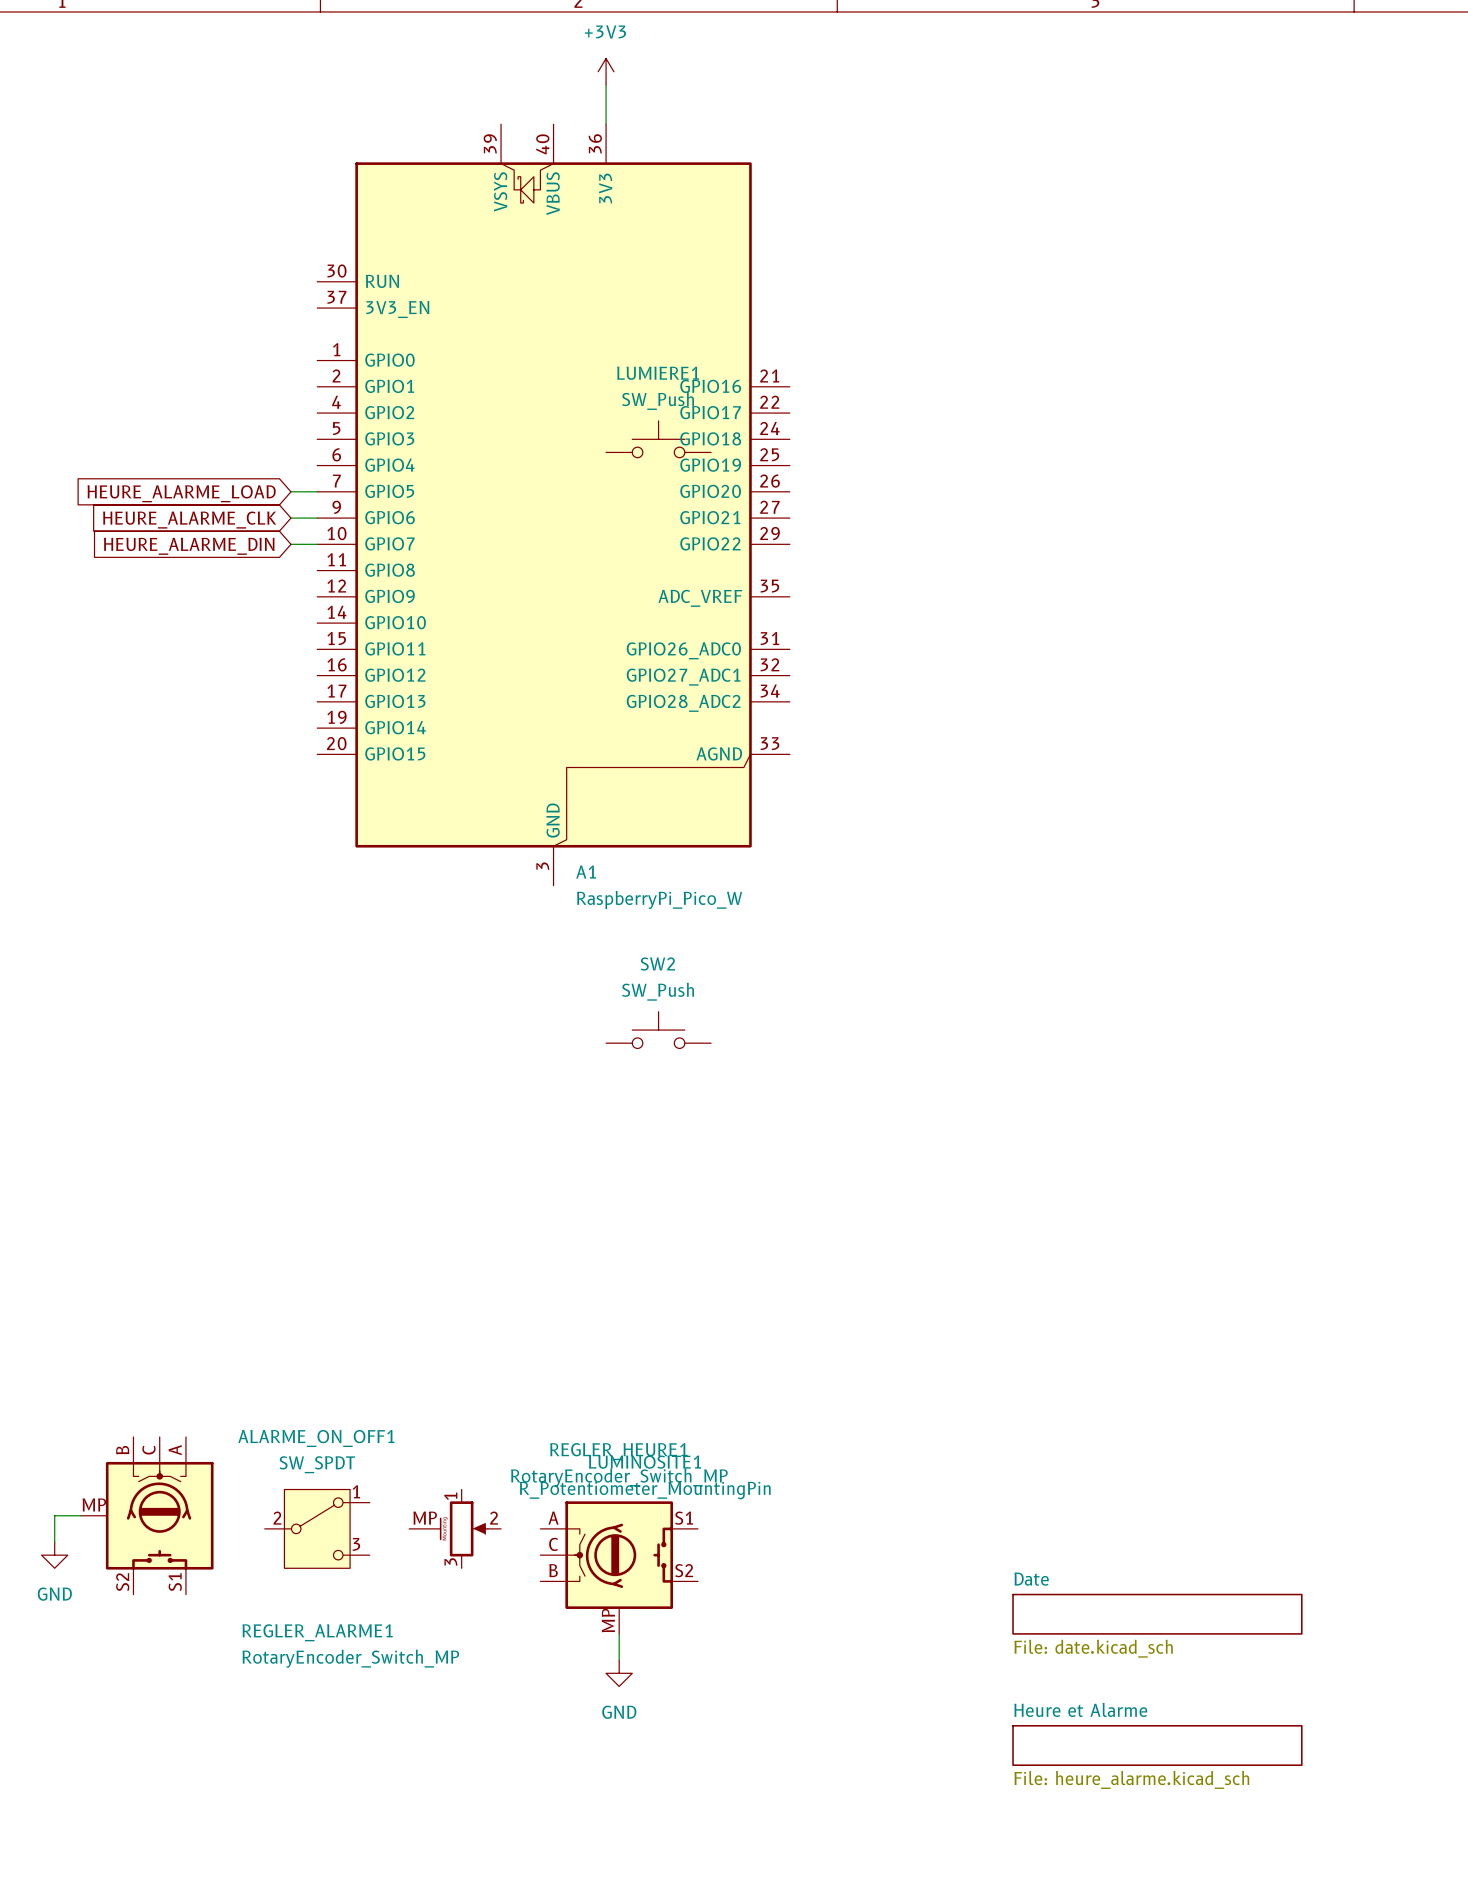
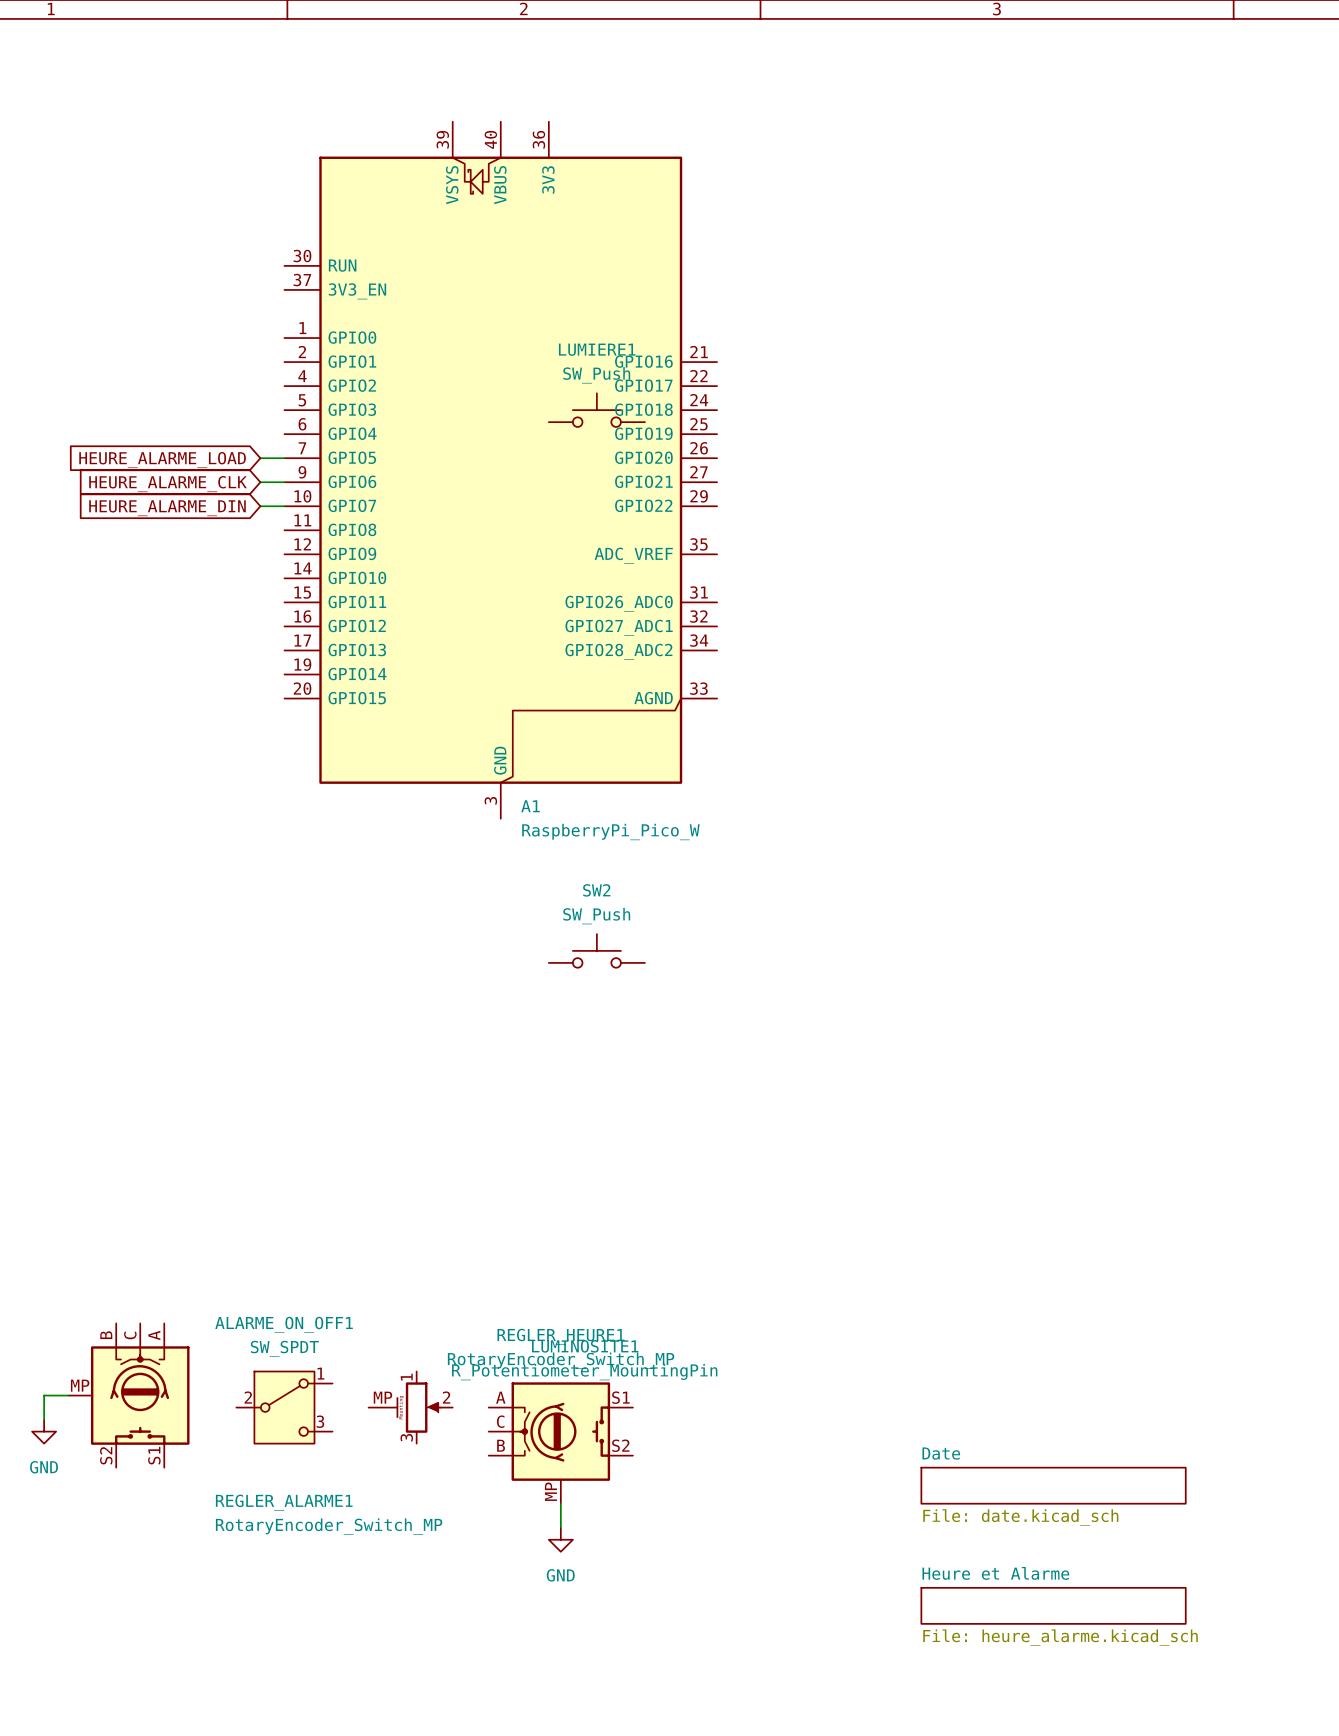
power symbol: +3V3 (606, 71) -> none
wire: (606, 84) (606, 124) -> none

